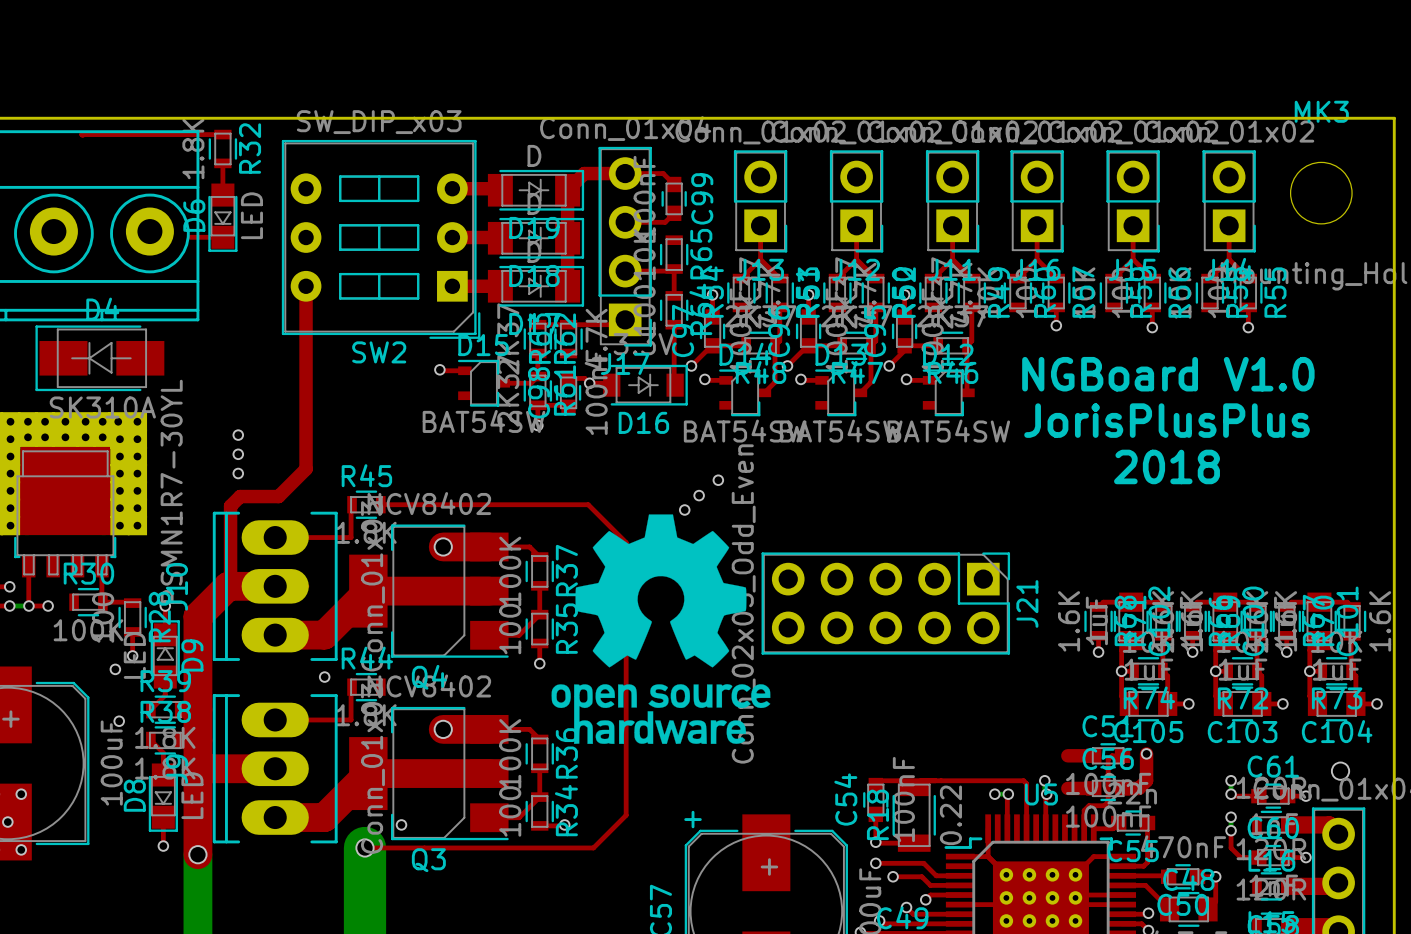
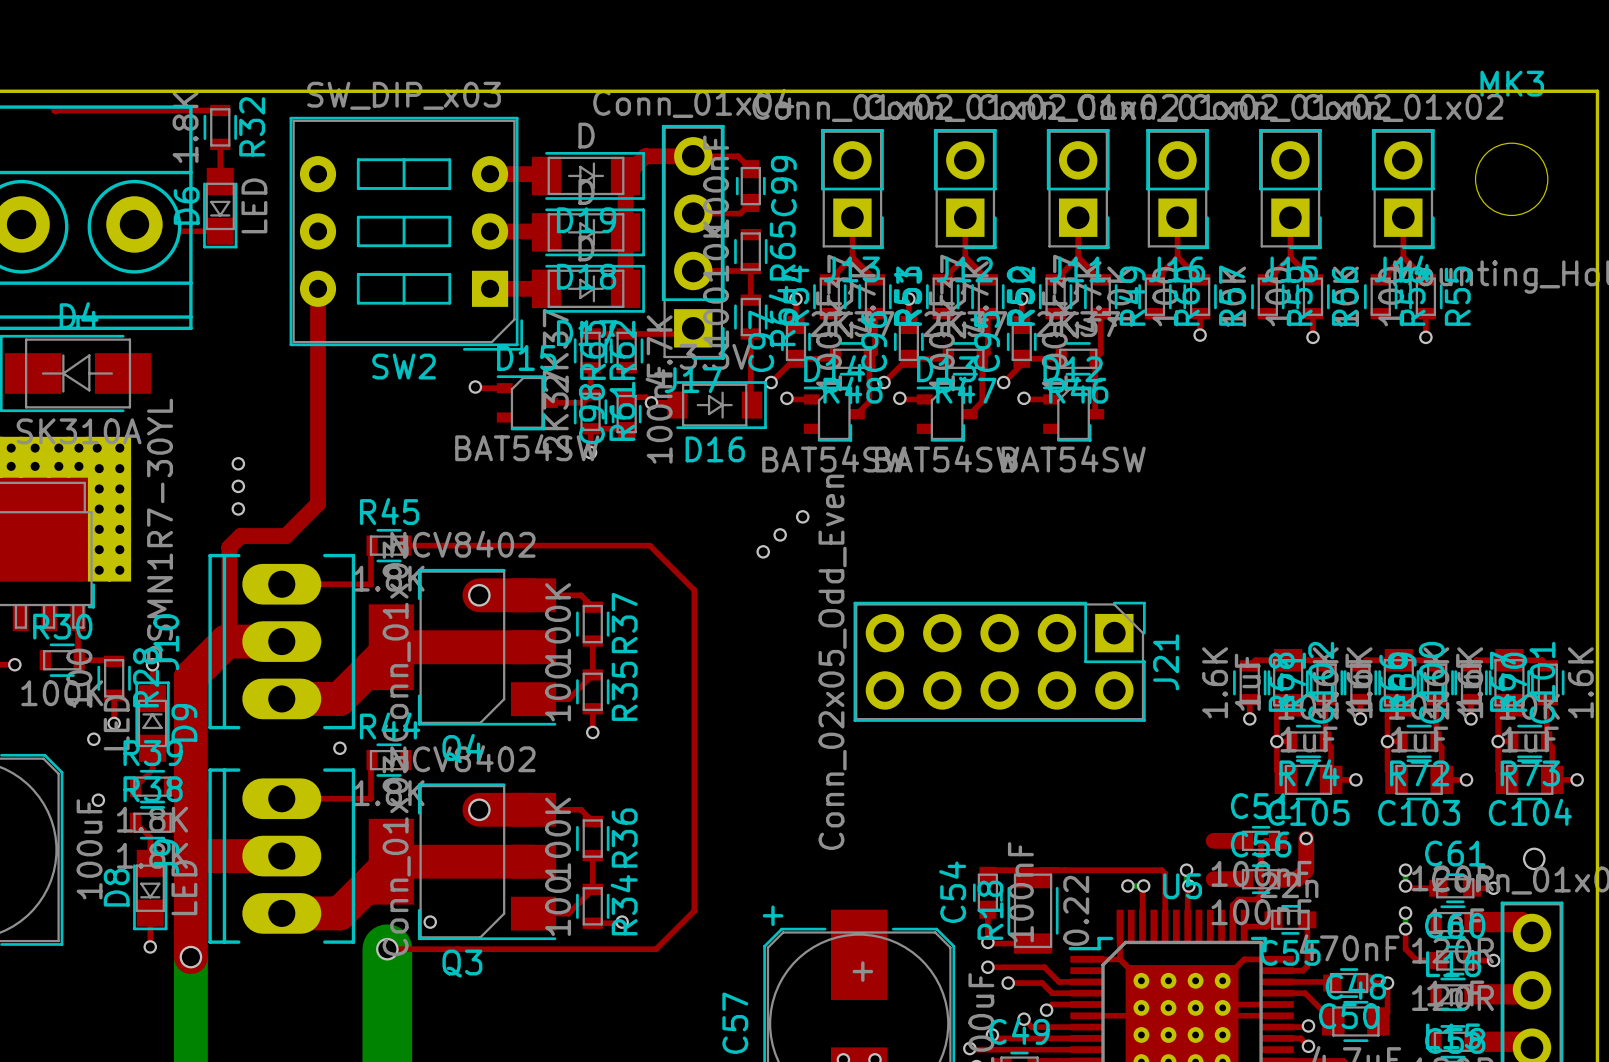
text: NGBoard V1.0 (1168, 374) -> none
text: JorisPlusPlus (1167, 420) -> none
text: 2018 (1167, 466) -> none
drawing: [551, 514, 771, 744] -> none

